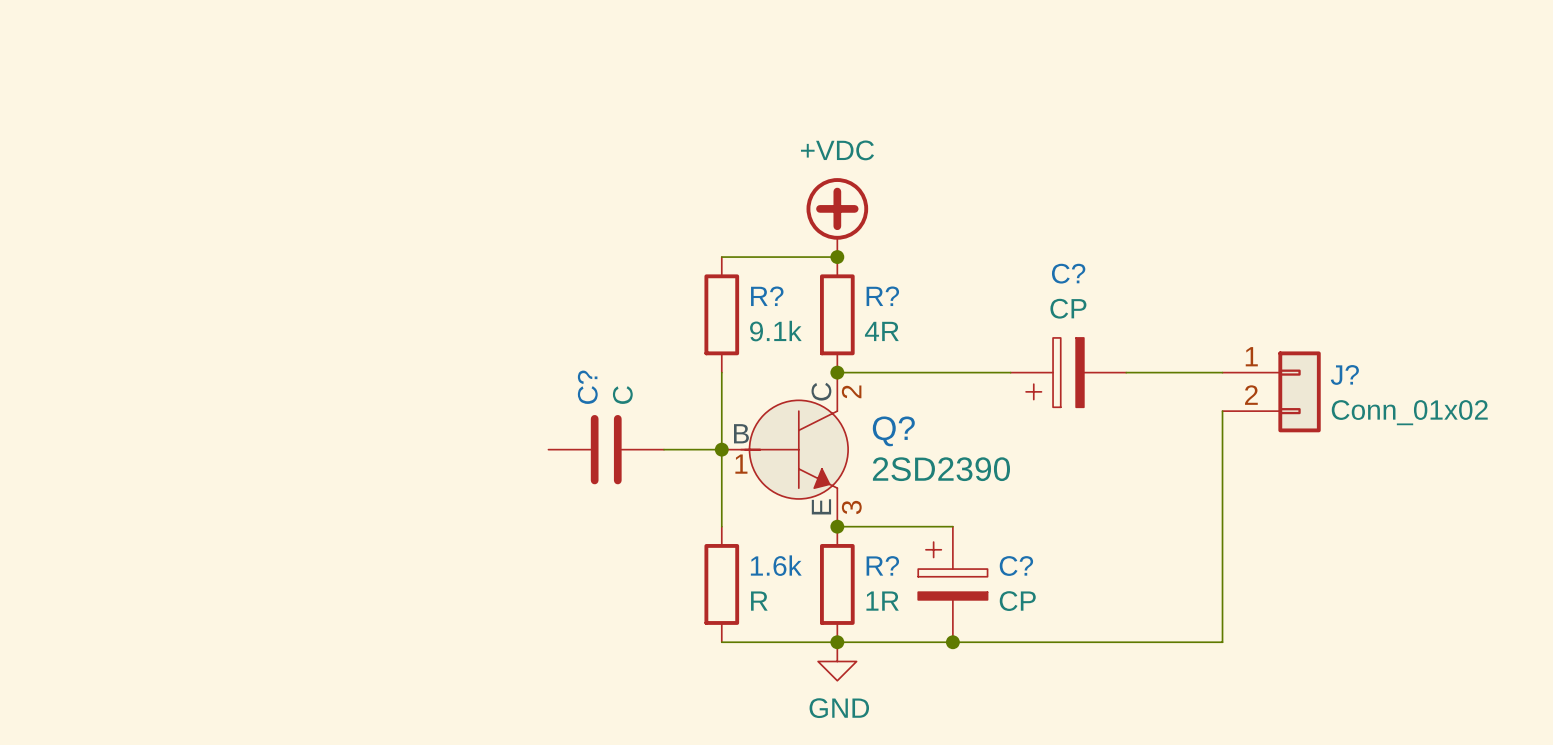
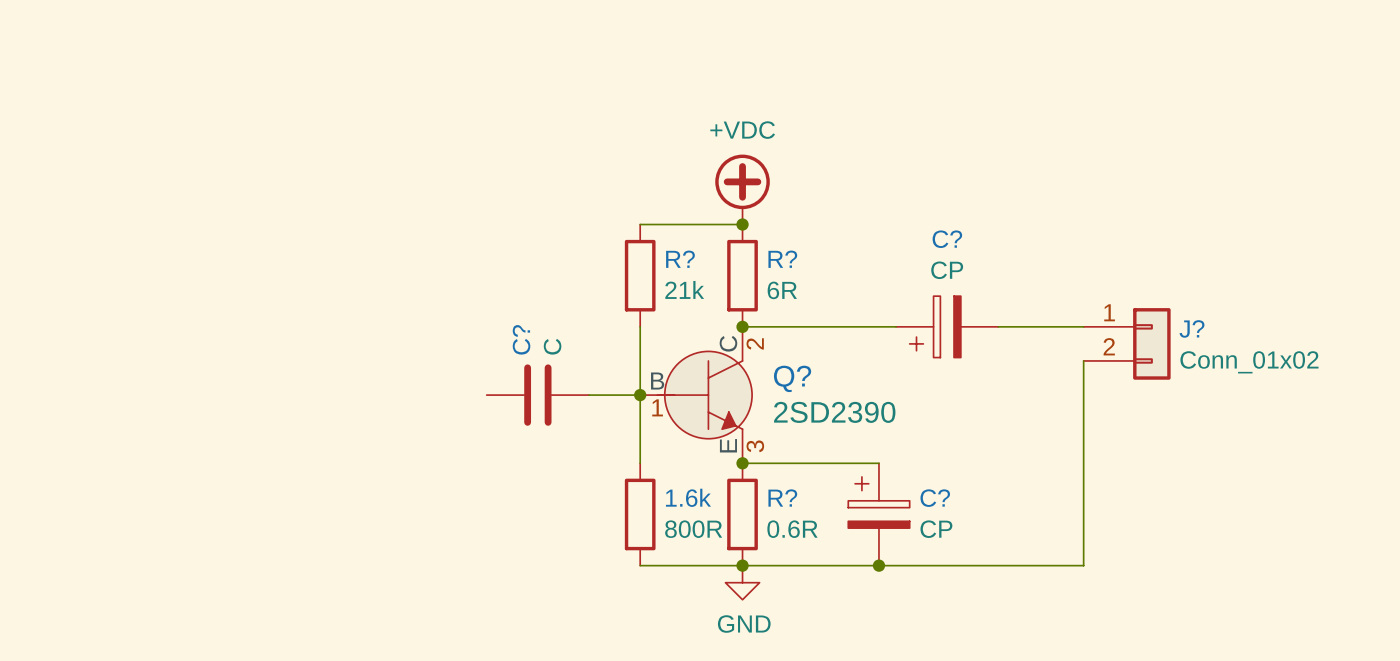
R? value: 9.1k (775, 331) -> 21k (684, 289)
R? value: 4R (881, 331) -> 6R (782, 290)
wire: none -> (844, 463) (878, 463)
C? position: (952, 584) -> (878, 514)
1.6k value: R (759, 601) -> 800R (693, 529)
R? value: 1R (882, 601) -> 0.6R (792, 529)
junction position: (952, 642) -> (878, 565)

